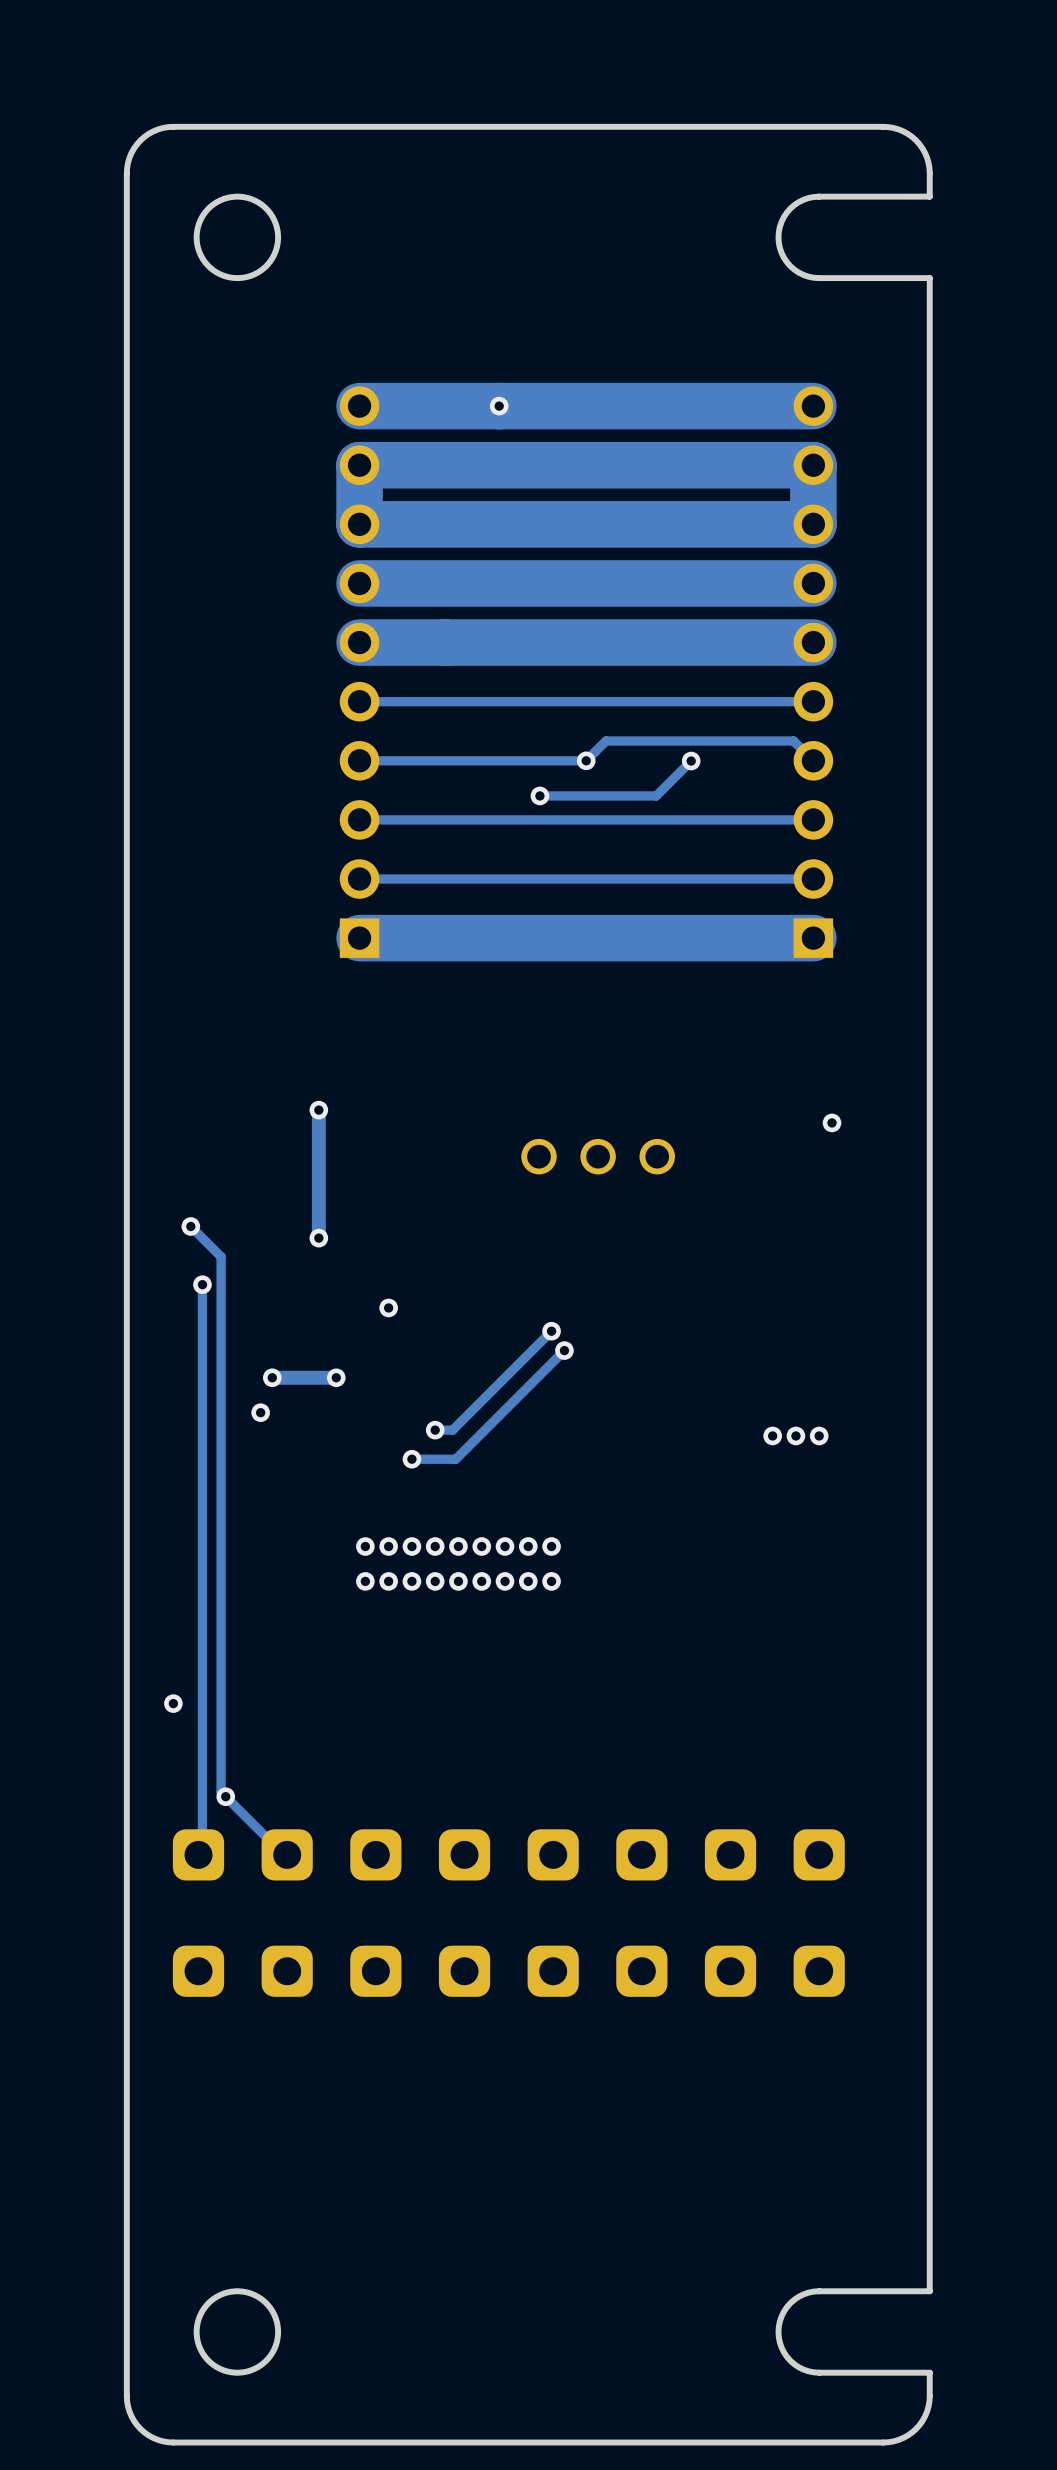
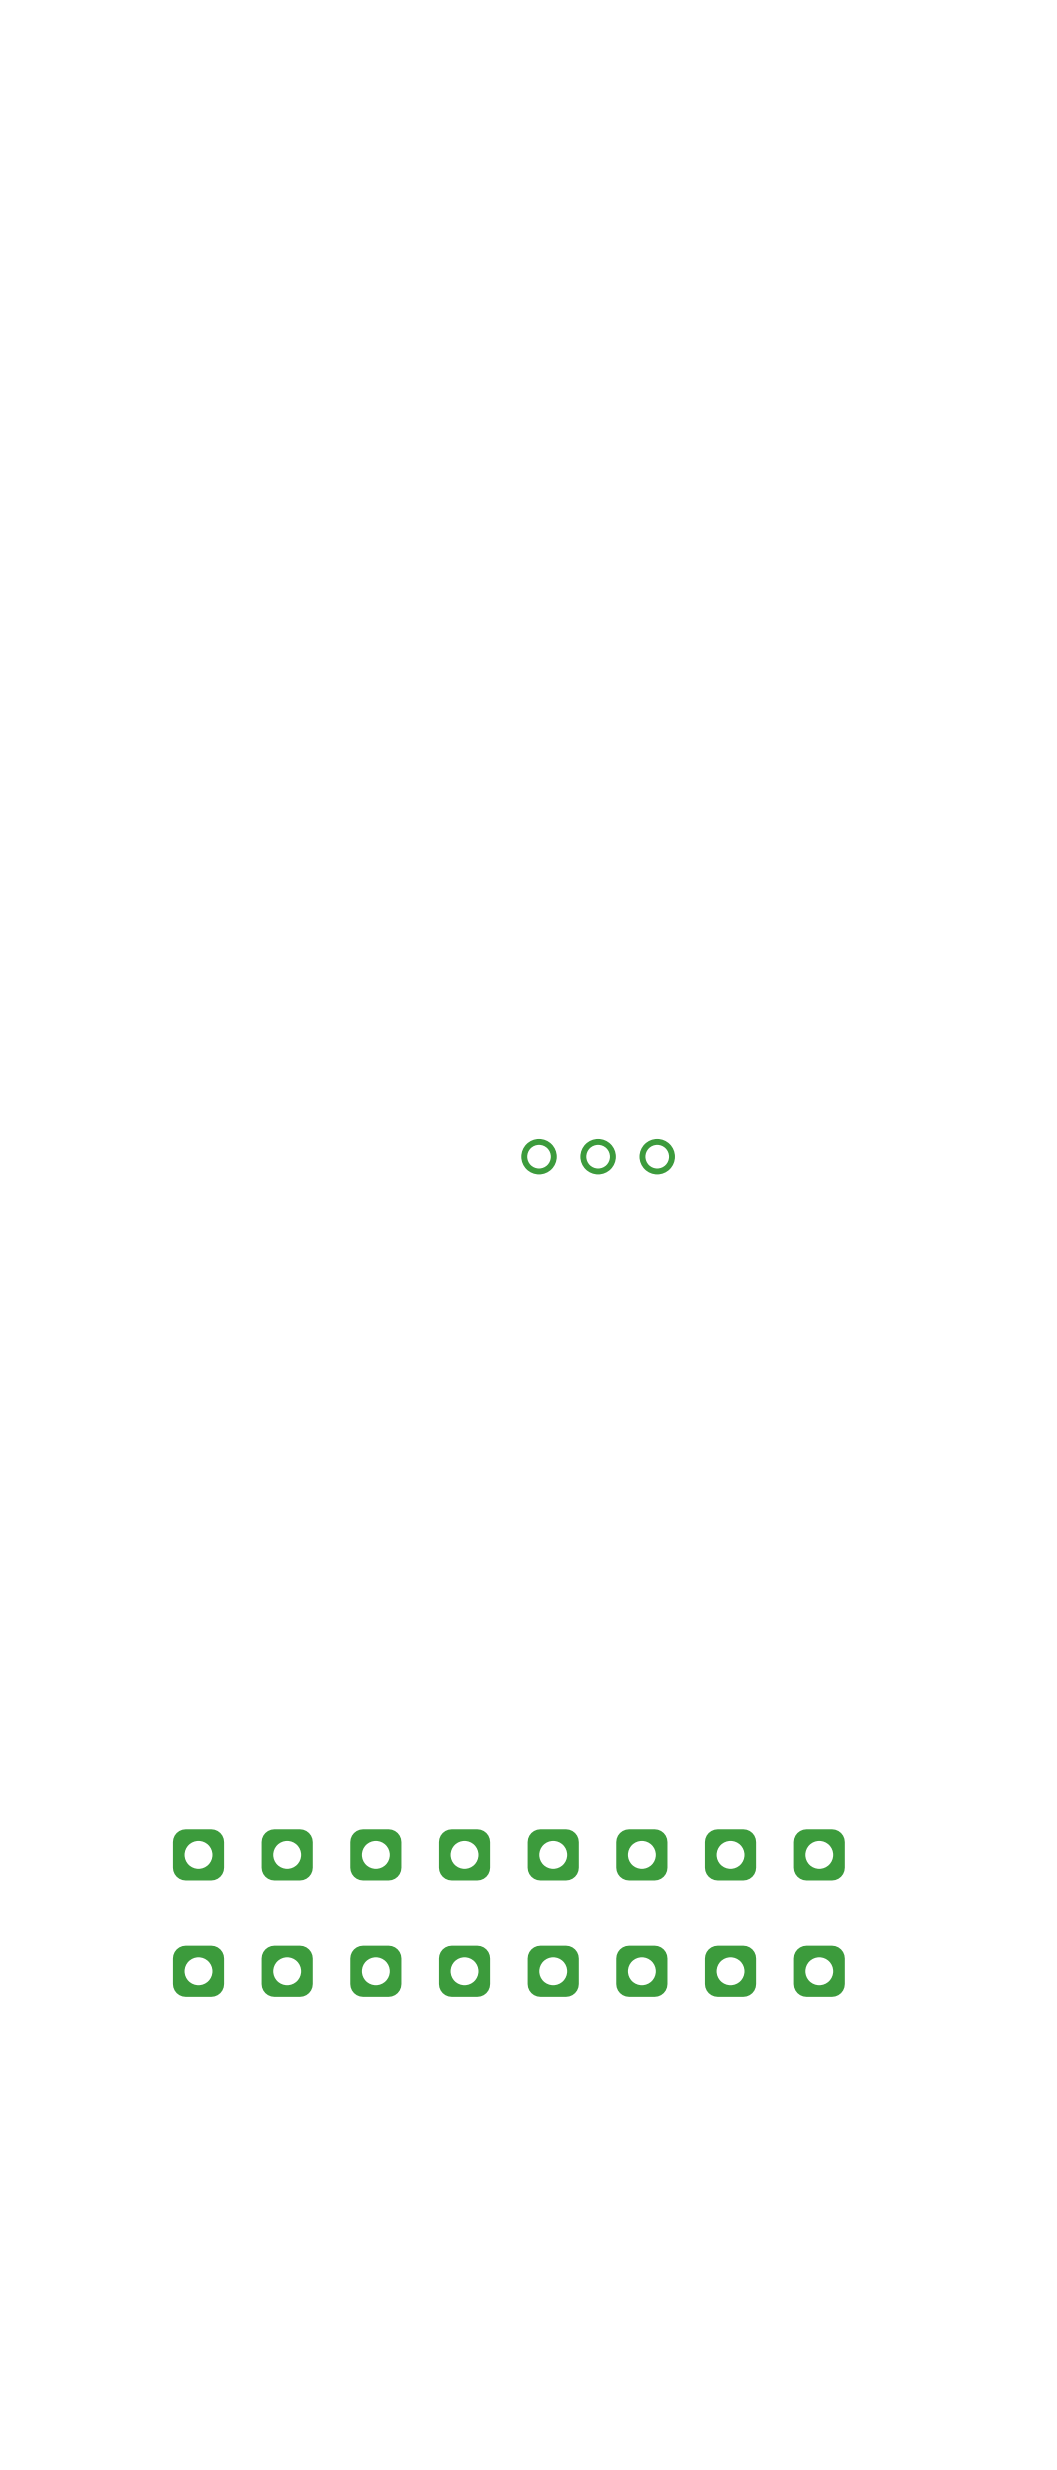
board edge: (883, 126) (173, 126) (158, 129) (144, 136) (133, 148) (129, 158) (126, 173) (126, 2395) (127, 2406) (133, 2420) (144, 2432) (158, 2439) (173, 2442) (883, 2442) (893, 2441) (907, 2435) (919, 2425) (927, 2411) (929, 2401) (929, 2372) (808, 2371) (794, 2364) (786, 2356) (779, 2342) (778, 2331) (779, 2321) (786, 2307) (794, 2299) (808, 2292) (929, 2291) (929, 278) (808, 276) (798, 272) (786, 262) (779, 247) (778, 237) (779, 226) (786, 212) (798, 202) (808, 198) (929, 196) (929, 168) (922, 148) (912, 136) (903, 131) (883, 126) -> none
round board edge: [193, 193, 282, 282] -> none
via: (499, 406) -> none
track: (813, 406) (359, 406) -> none
track: (813, 465) (813, 524) (359, 524) (359, 465) (813, 465) -> none
track: (813, 583) (359, 583) -> none
track: (813, 642) (359, 642) -> none
part: (359, 672) -> none
part: (813, 672) -> none
track: (813, 701) (359, 701) -> none
via: (586, 760) -> none
track: (813, 760) (793, 741) (606, 741) (586, 760) (359, 760) -> none
track: (691, 761) (656, 795) (539, 795) -> none
via: (691, 761) -> none
via: (539, 795) -> none
track: (813, 819) (359, 819) -> none
track: (813, 879) (359, 879) -> none
track: (813, 938) (359, 938) -> none
track: (318, 1110) (318, 1238) -> none
via: (318, 1110) -> none
via: (832, 1122) -> none
track: (190, 1226) (221, 1256) (221, 1792) (283, 1854) (287, 1854) -> none
via: (190, 1226) -> none
via: (318, 1238) -> none
track: (202, 1284) (202, 1850) (198, 1854) -> none
via: (202, 1284) -> none
via: (388, 1307) -> none
track: (551, 1331) (452, 1430) (435, 1430) -> none
via: (551, 1331) -> none
track: (564, 1350) (455, 1459) (411, 1459) -> none
via: (564, 1350) -> none
via: (272, 1377) -> none
track: (336, 1377) (272, 1377) -> none
via: (336, 1377) -> none
via: (260, 1412) -> none
via: (435, 1430) -> none
via: (772, 1435) -> none
via: (795, 1435) -> none
via: (819, 1435) -> none
via: (411, 1459) -> none
via: (365, 1546) -> none
via: (388, 1546) -> none
via: (411, 1546) -> none
via: (435, 1546) -> none
via: (458, 1546) -> none
via: (481, 1546) -> none
via: (505, 1546) -> none
via: (528, 1546) -> none
via: (551, 1546) -> none
via: (365, 1581) -> none
via: (388, 1581) -> none
via: (411, 1581) -> none
via: (435, 1581) -> none
via: (458, 1581) -> none
via: (481, 1581) -> none
via: (505, 1581) -> none
via: (528, 1581) -> none
via: (551, 1581) -> none
via: (173, 1703) -> none
via: (225, 1796) -> none
round board edge: [193, 2288, 282, 2376] -> none

